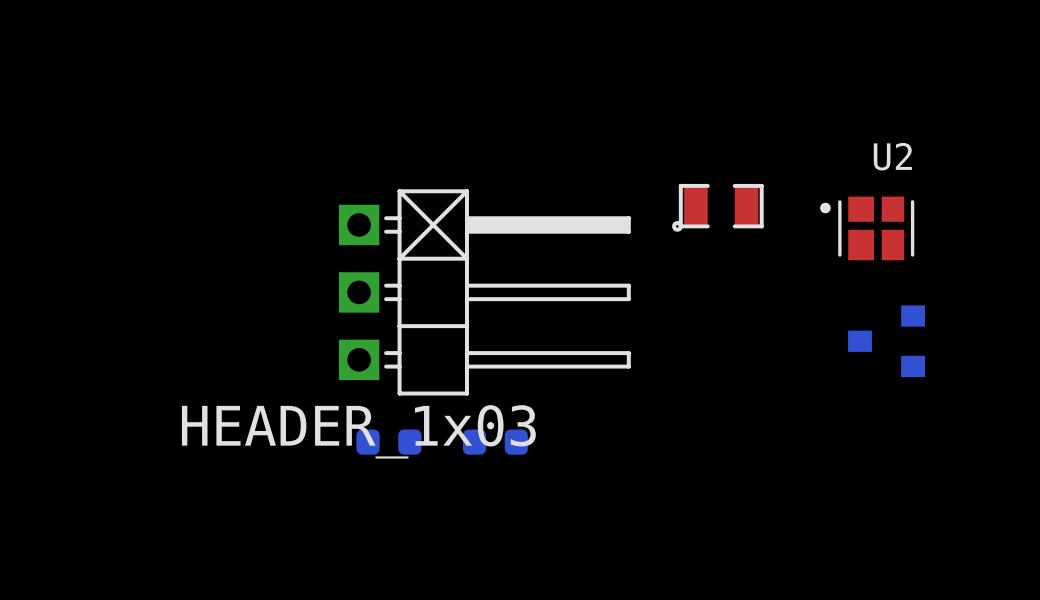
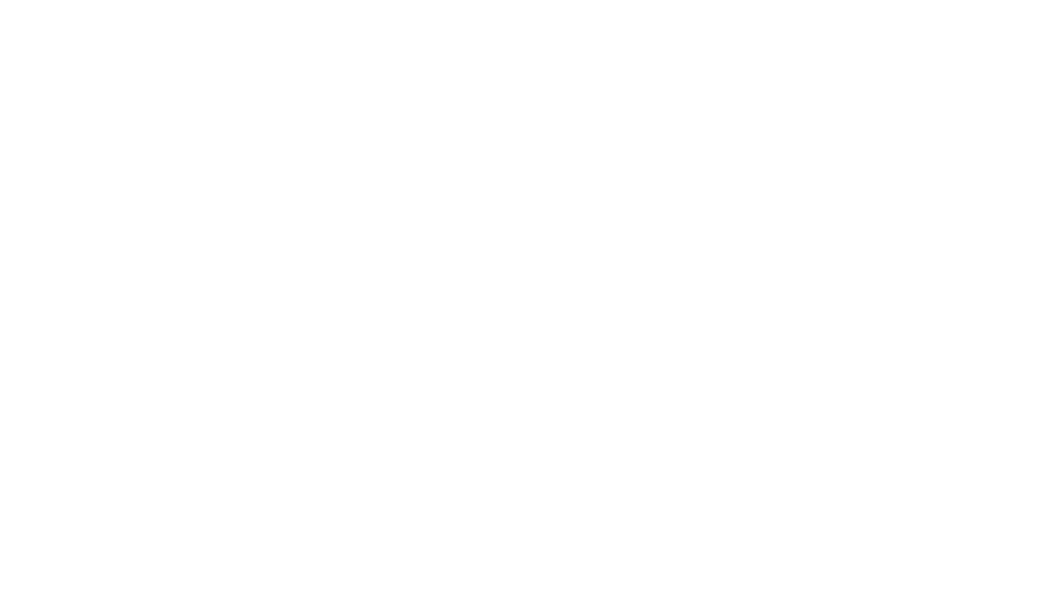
part: (717, 207) -> none
U2: (867, 228) -> none
part: HEADER_1x03 (484, 292) -> none
part: (886, 341) -> none
part: (388, 442) -> none
part: (495, 442) -> none

